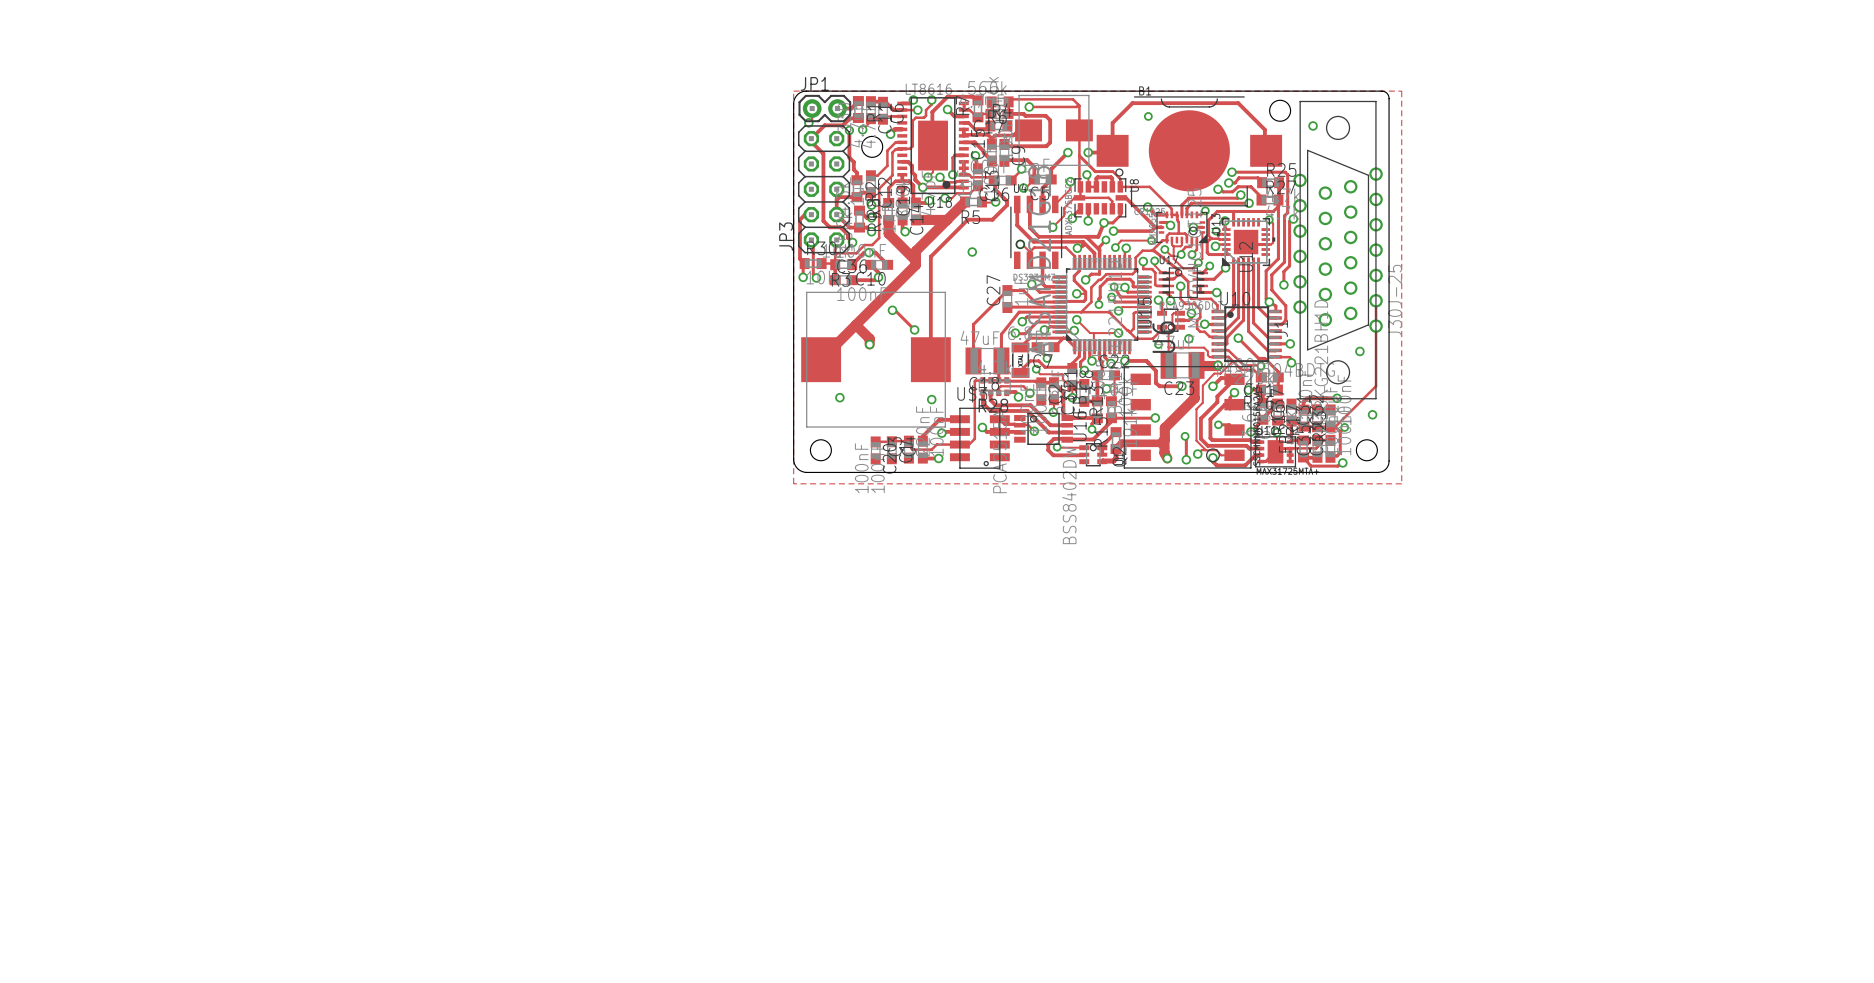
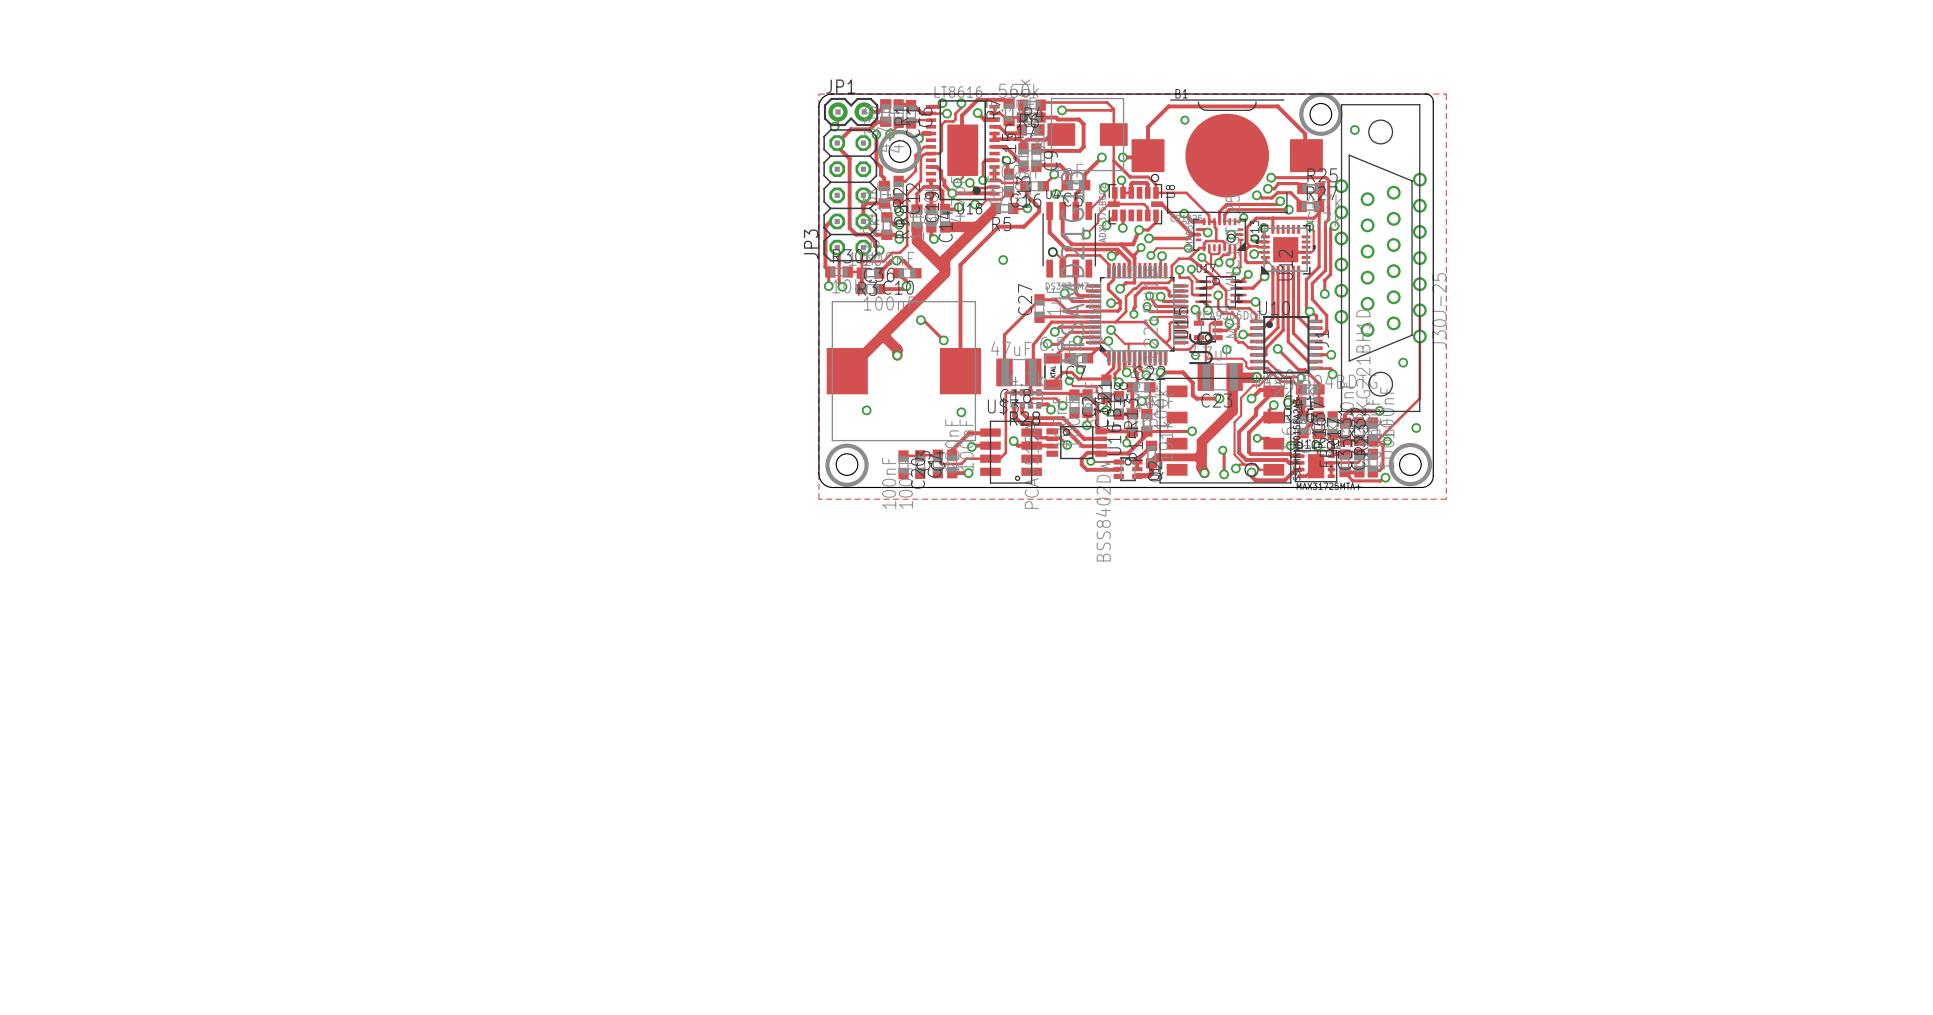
drawing: none -> [1299, 92, 1343, 136]
drawing: none -> [878, 129, 922, 174]
drawing: none -> [825, 443, 869, 487]
drawing: none -> [1388, 442, 1433, 487]

